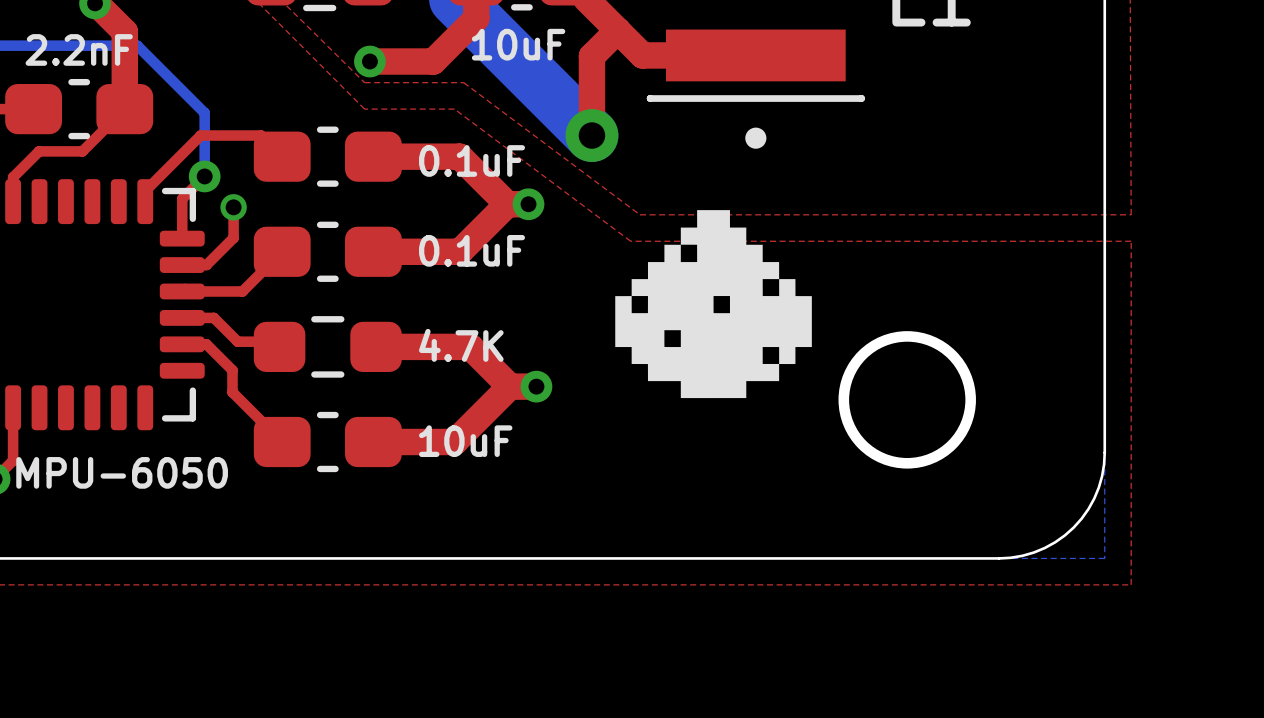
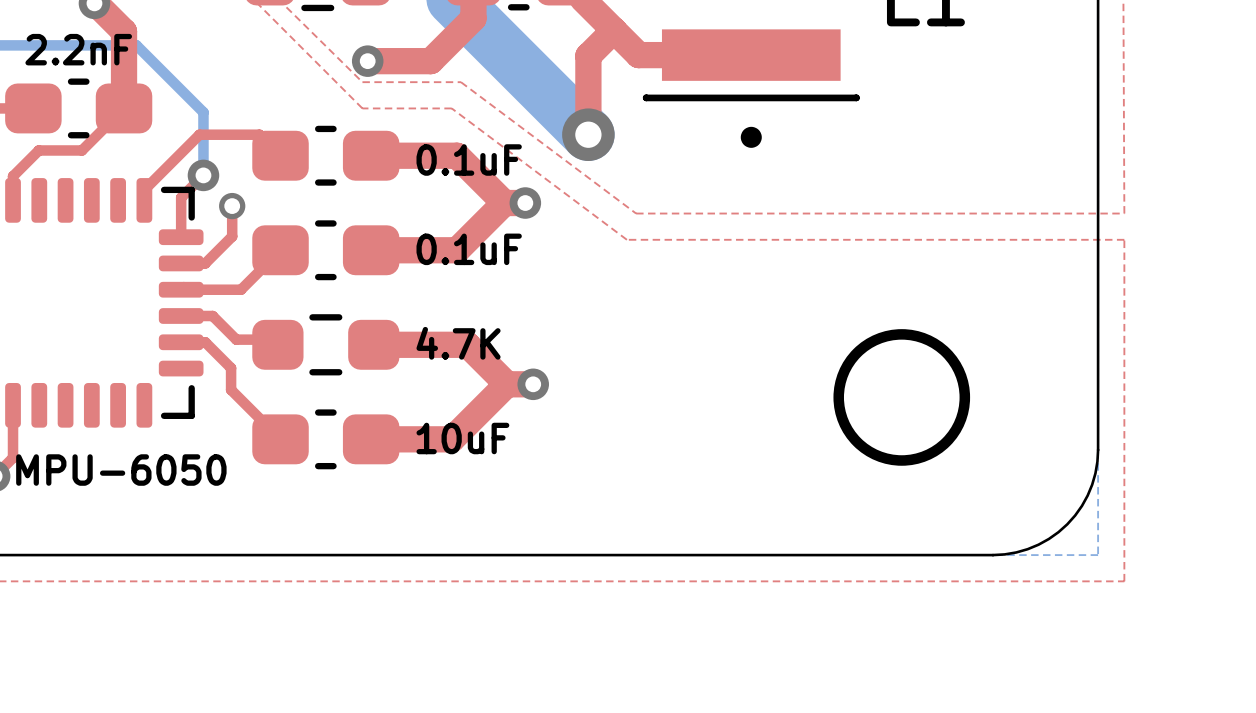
part value: 10uF (518, 44) -> none
drawing: [615, 210, 812, 399] -> none

